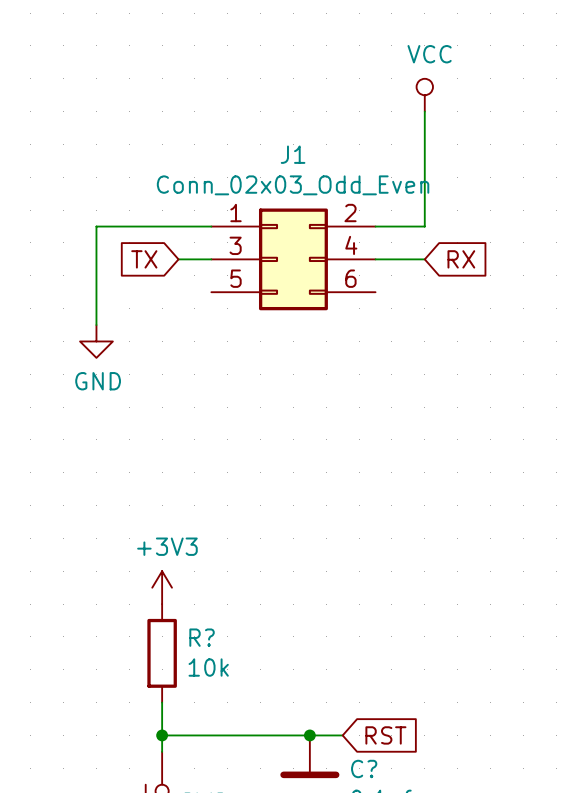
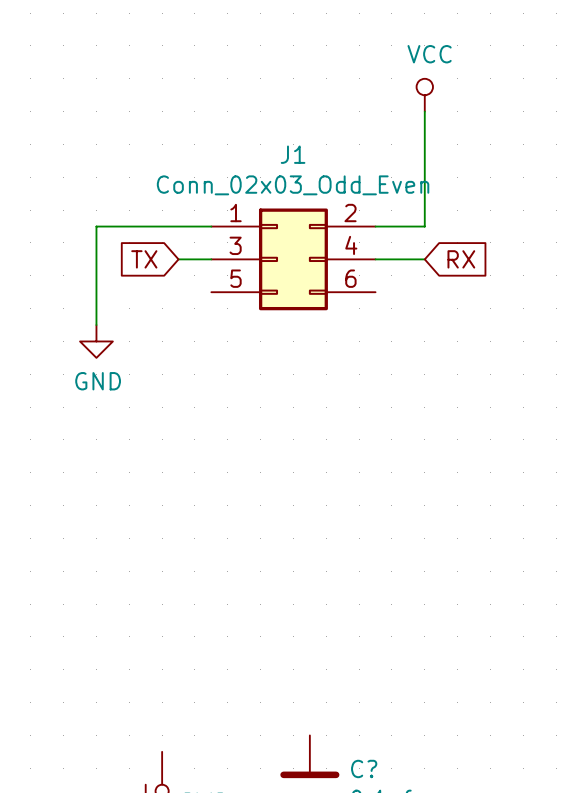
power symbol: +3V3 (162, 587) -> none
R?: 10k (162, 653) -> none
wire: (162, 702) (162, 751) -> none
wire: (162, 735) (342, 735) -> none
junction: (162, 735) -> none
junction: (309, 735) -> none
global label: RST (385, 735) -> none

